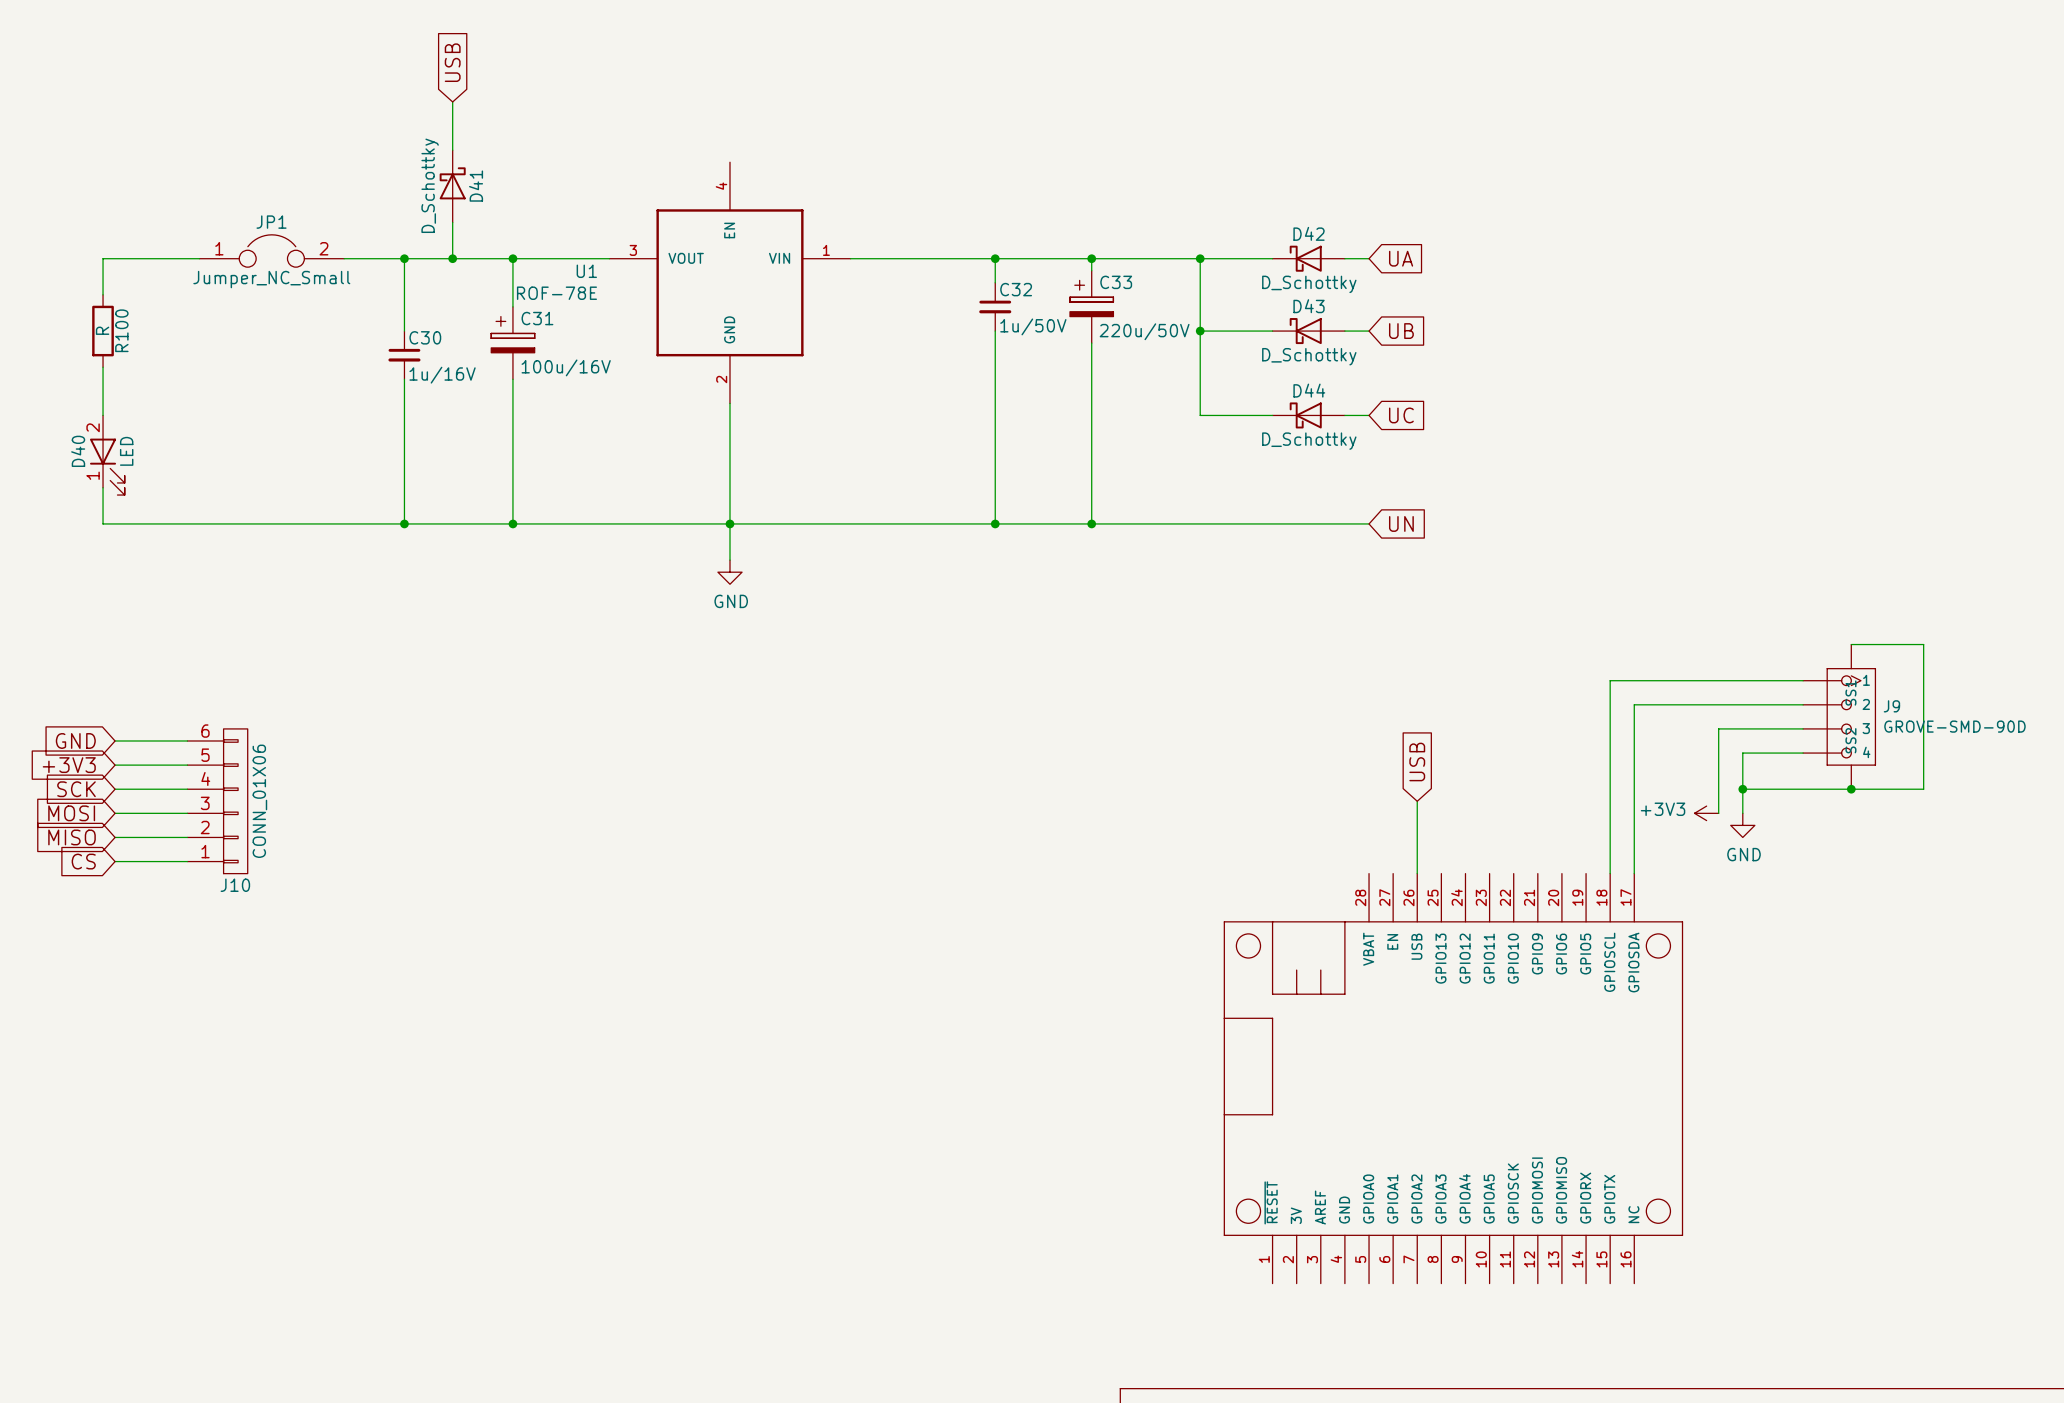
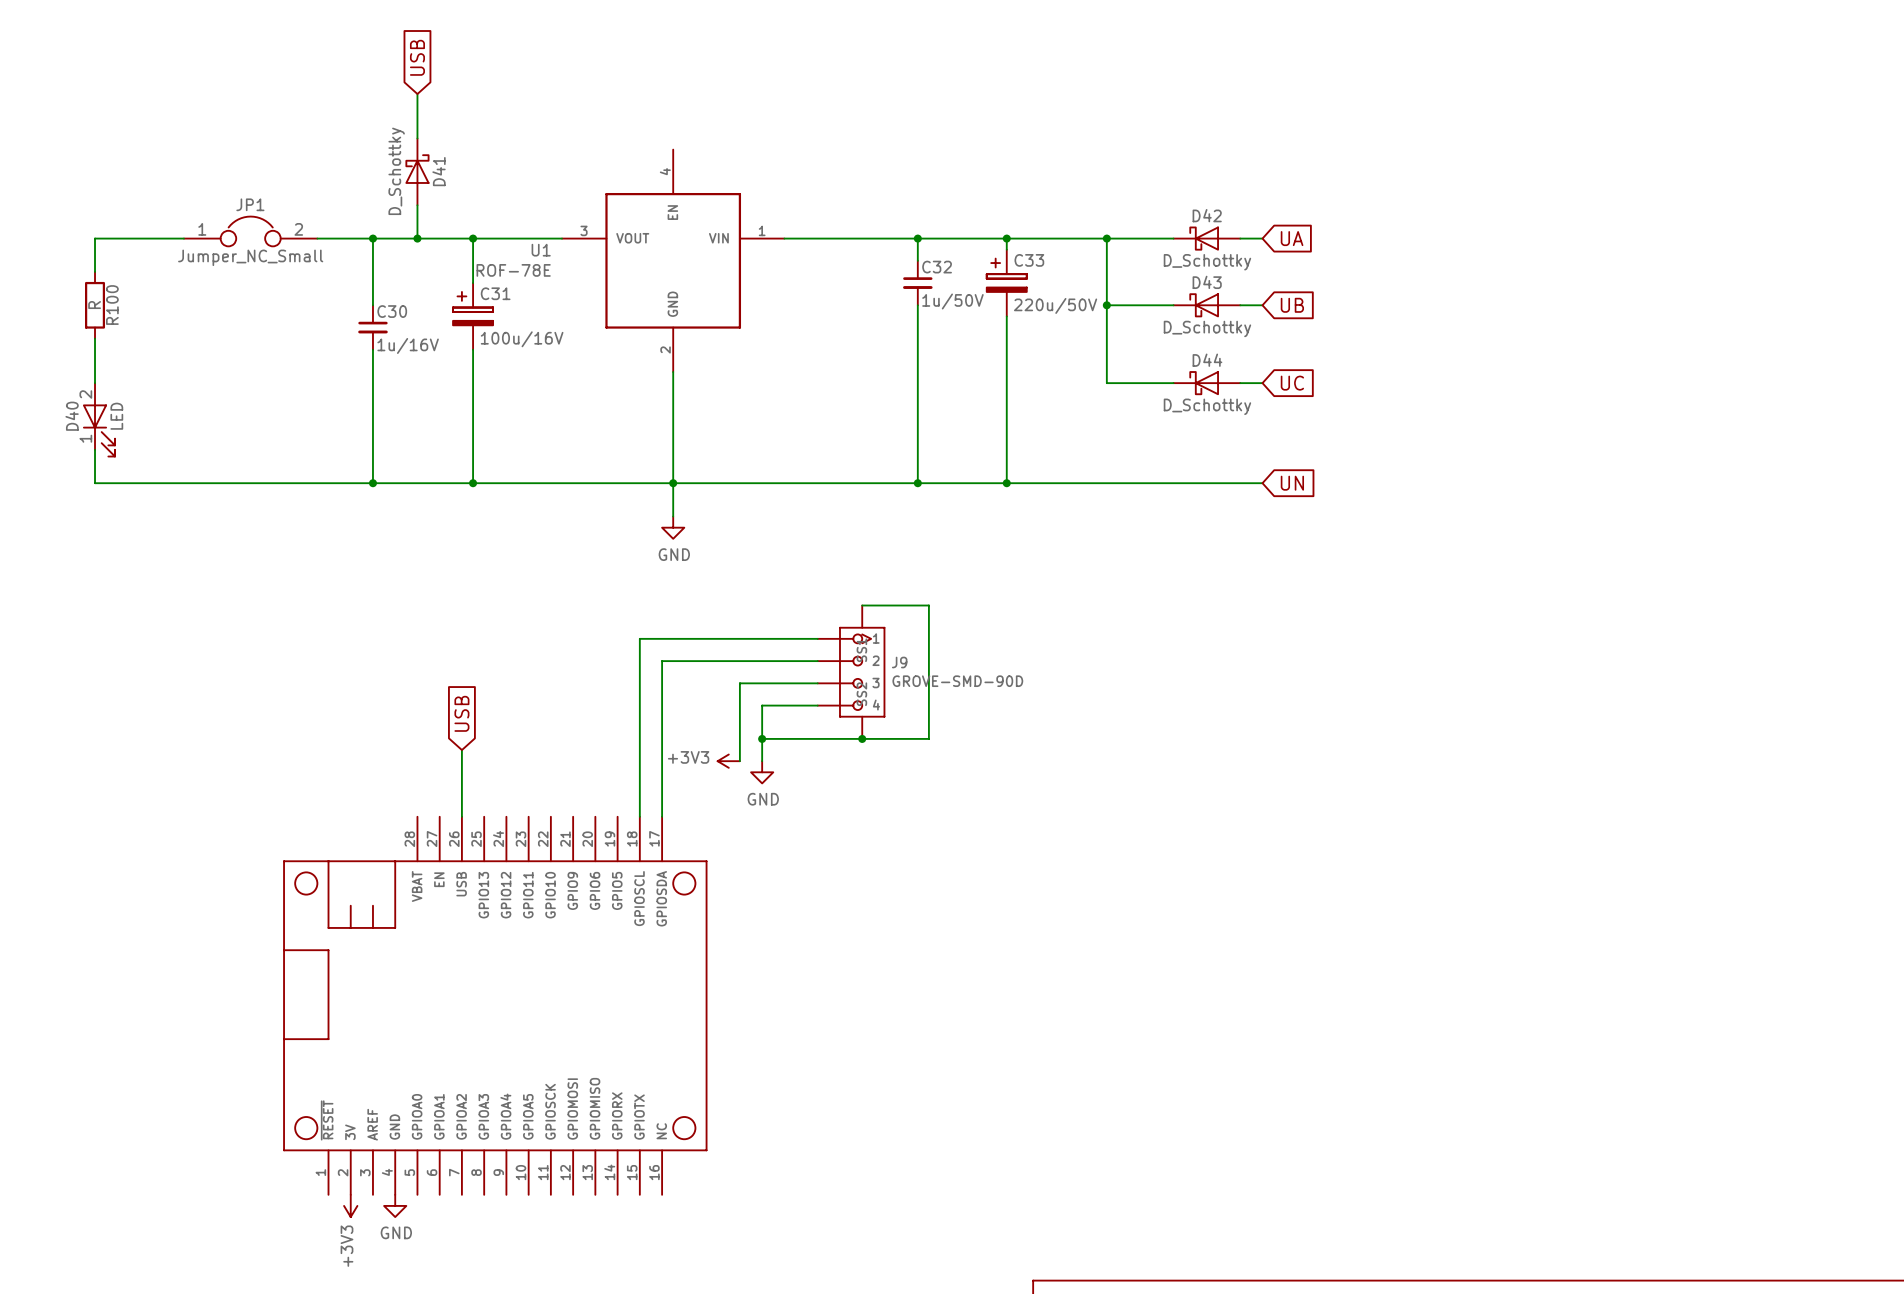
wire: (1851, 644) (1923, 644) (1923, 789) (1742, 789) -> none
wire: none -> (862, 605) (928, 605) (928, 738) (762, 738)
wire: (1803, 680) (1610, 680) (1610, 873) -> none
wire: none -> (817, 638) (639, 638) (639, 816)
wire: (1803, 704) (1634, 704) (1634, 873) -> none
wire: none -> (817, 661) (662, 661) (662, 816)
J9 position: (1839, 716) -> (851, 672)
wire: (1803, 728) (1718, 728) (1718, 813) -> none
global label: GND (75, 740) -> none
wire: (115, 740) (187, 740) -> none
wire: none -> (817, 683) (739, 683) (739, 761)
wire: (1803, 753) (1742, 753) (1742, 813) -> none
global label: USB (1417, 762) -> none
global label: +3V3 (69, 765) -> none
wire: (115, 765) (187, 765) -> none
wire: none -> (817, 705) (762, 705) (762, 761)
global label: none -> USB (461, 713)
global label: SCK (76, 789) -> none
wire: (115, 789) (187, 789) -> none
junction: (1742, 789) -> none
junction: (1851, 789) -> none
J10: CONN_01X06 (217, 801) -> none
junction: none -> (762, 738)
junction: none -> (862, 738)
wire: (1417, 801) (1417, 873) -> none
global label: MOSI (71, 813) -> none
wire: (115, 813) (187, 813) -> none
wire: none -> (461, 750) (461, 816)
power symbol: +3V3 (1706, 813) -> none
power symbol: none -> +3V3 (728, 761)
power symbol: GND (1742, 825) -> none
global label: MISO (72, 837) -> none
wire: (115, 837) (187, 837) -> none
power symbol: none -> GND (762, 772)
global label: CS (83, 861) -> none
wire: (115, 861) (187, 861) -> none
part: (1453, 1078) -> none
part: none -> (495, 1005)
power symbol: none -> +3V3 (350, 1205)
power symbol: none -> GND (395, 1205)

